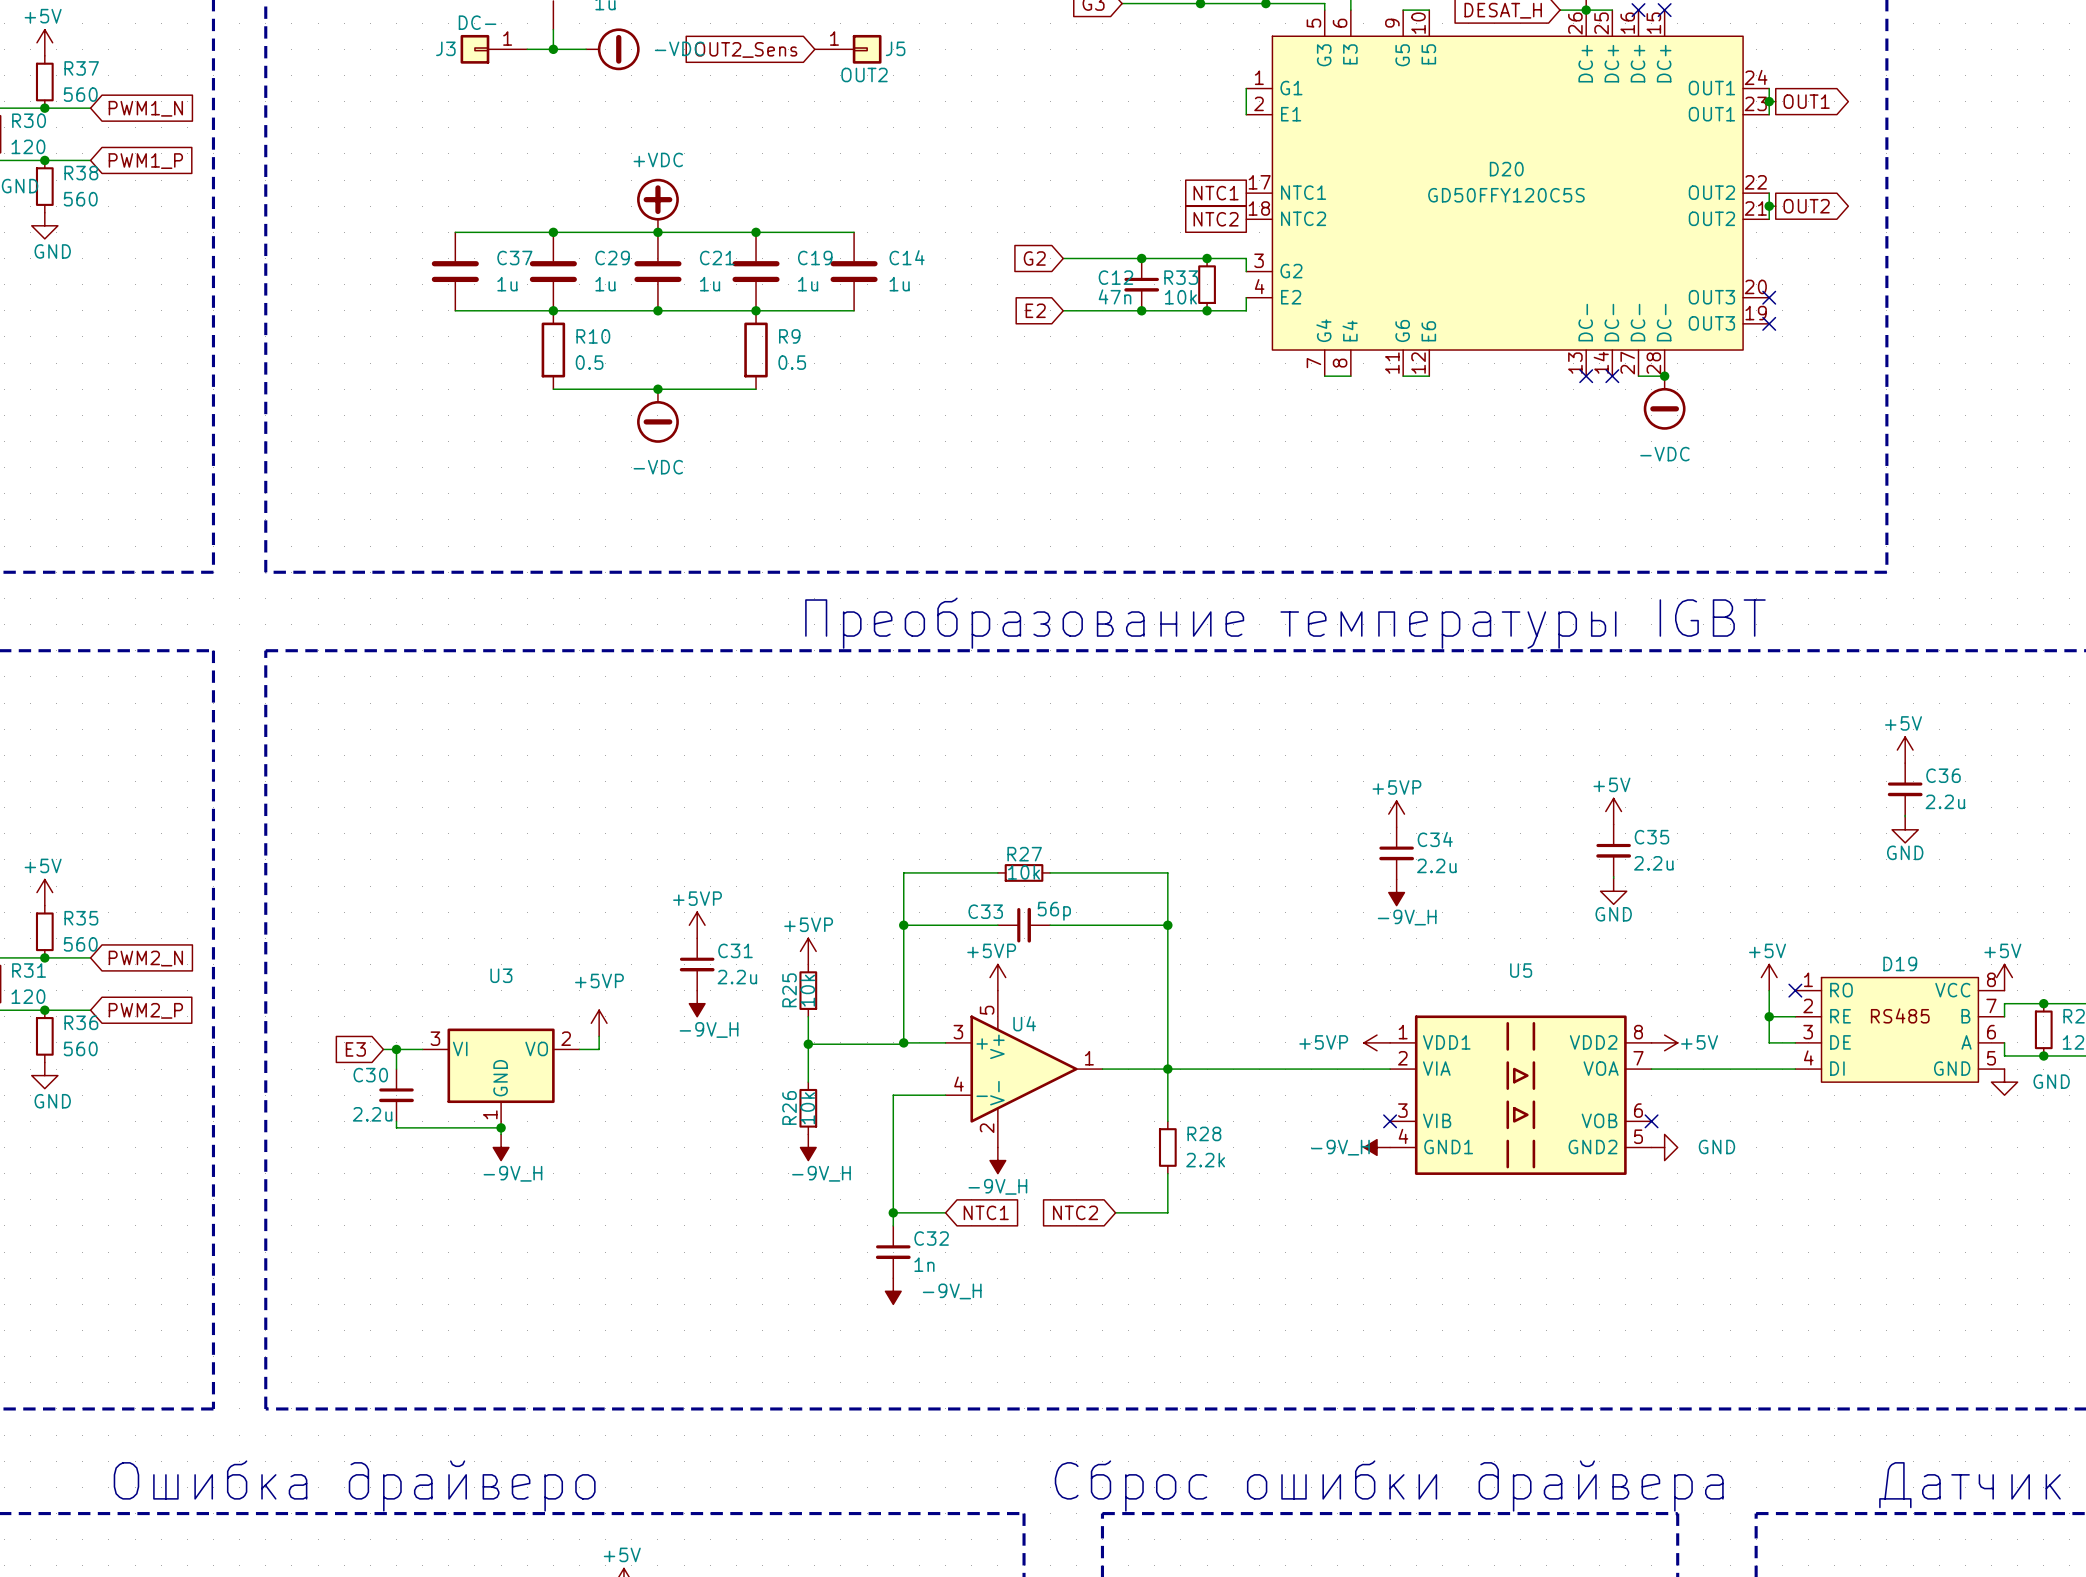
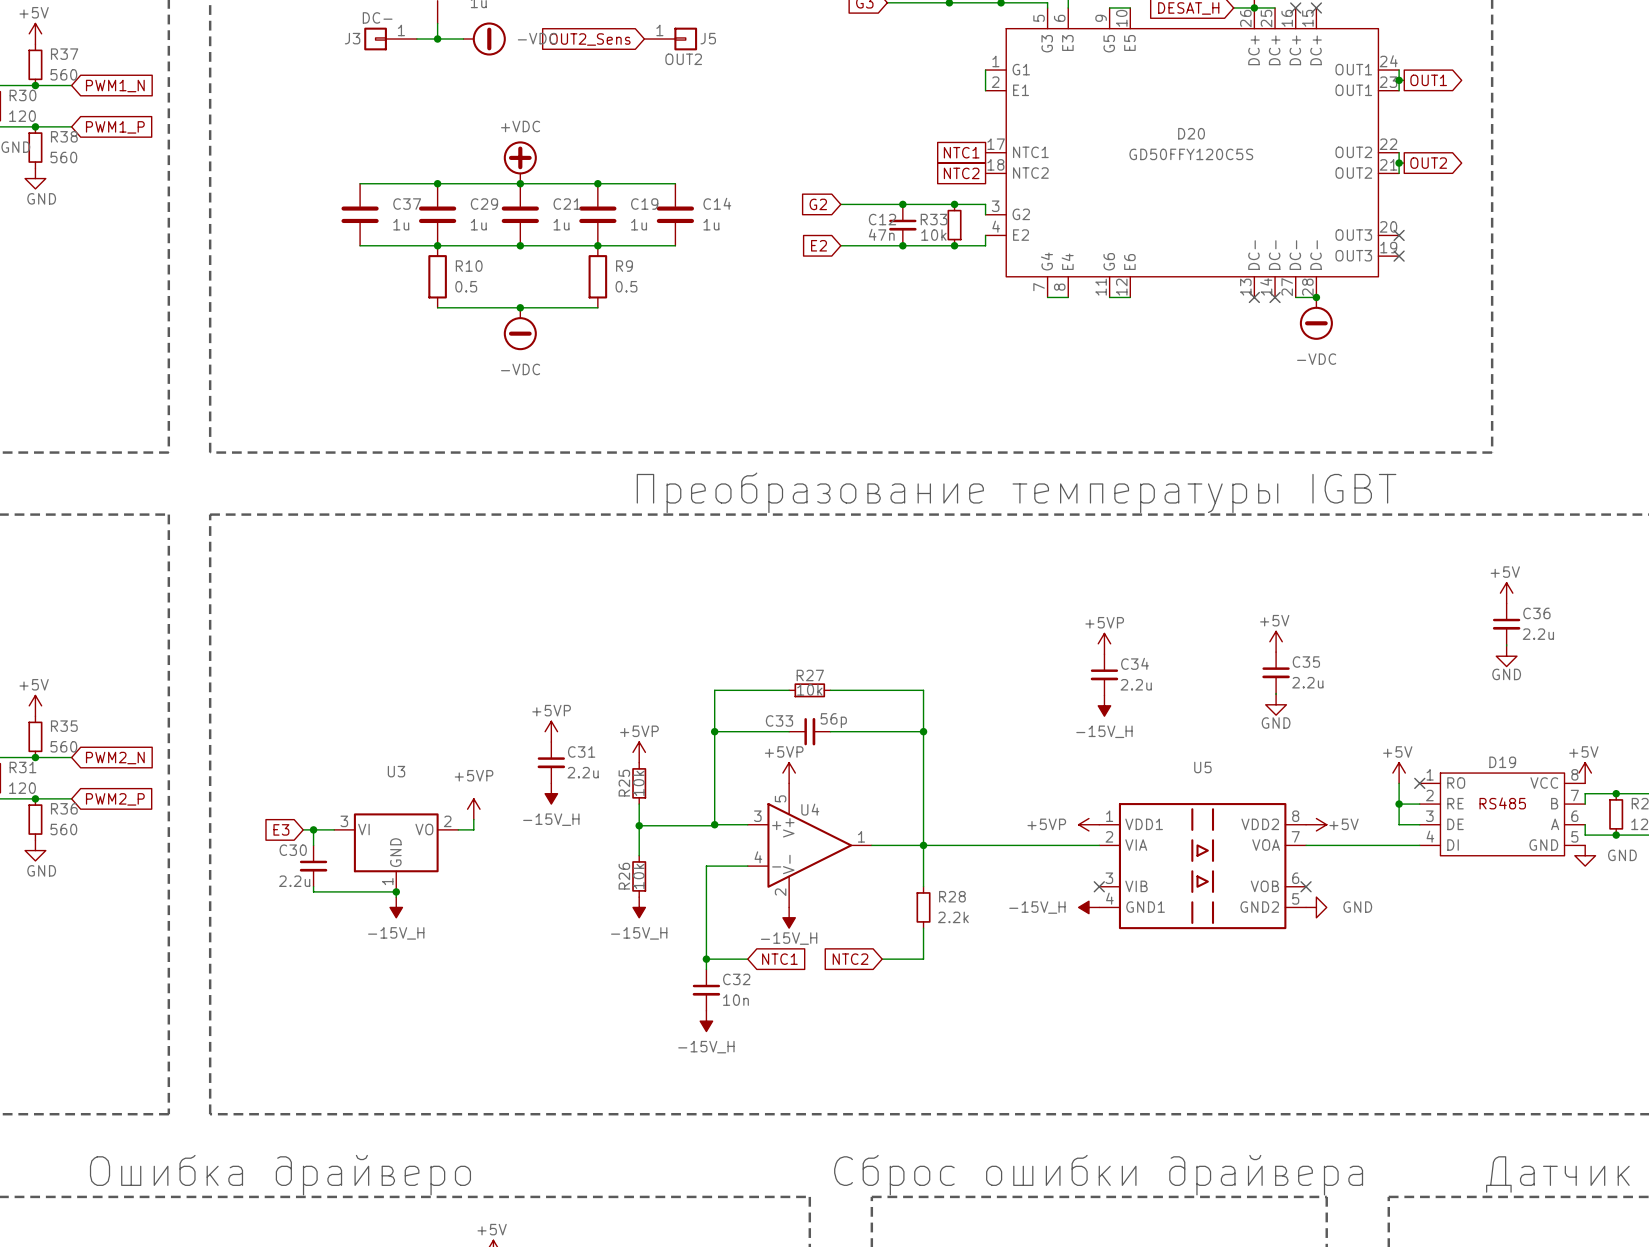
power symbol: -9V_H (1396, 892) -> -15V_H (1104, 705)
power symbol: -9V_H (697, 1003) -> -15V_H (551, 793)
power symbol: -9V_H (501, 1147) -> -15V_H (396, 907)
power symbol: -9V_H (808, 1147) -> -15V_H (639, 907)
power symbol: -9V_H (1377, 1147) -> -15V_H (1088, 907)
power symbol: -9V_H (997, 1160) -> -15V_H (789, 917)
C32 value: 1n (924, 1264) -> 10n (735, 1000)
power symbol: -9V_H (893, 1291) -> -15V_H (706, 1021)

